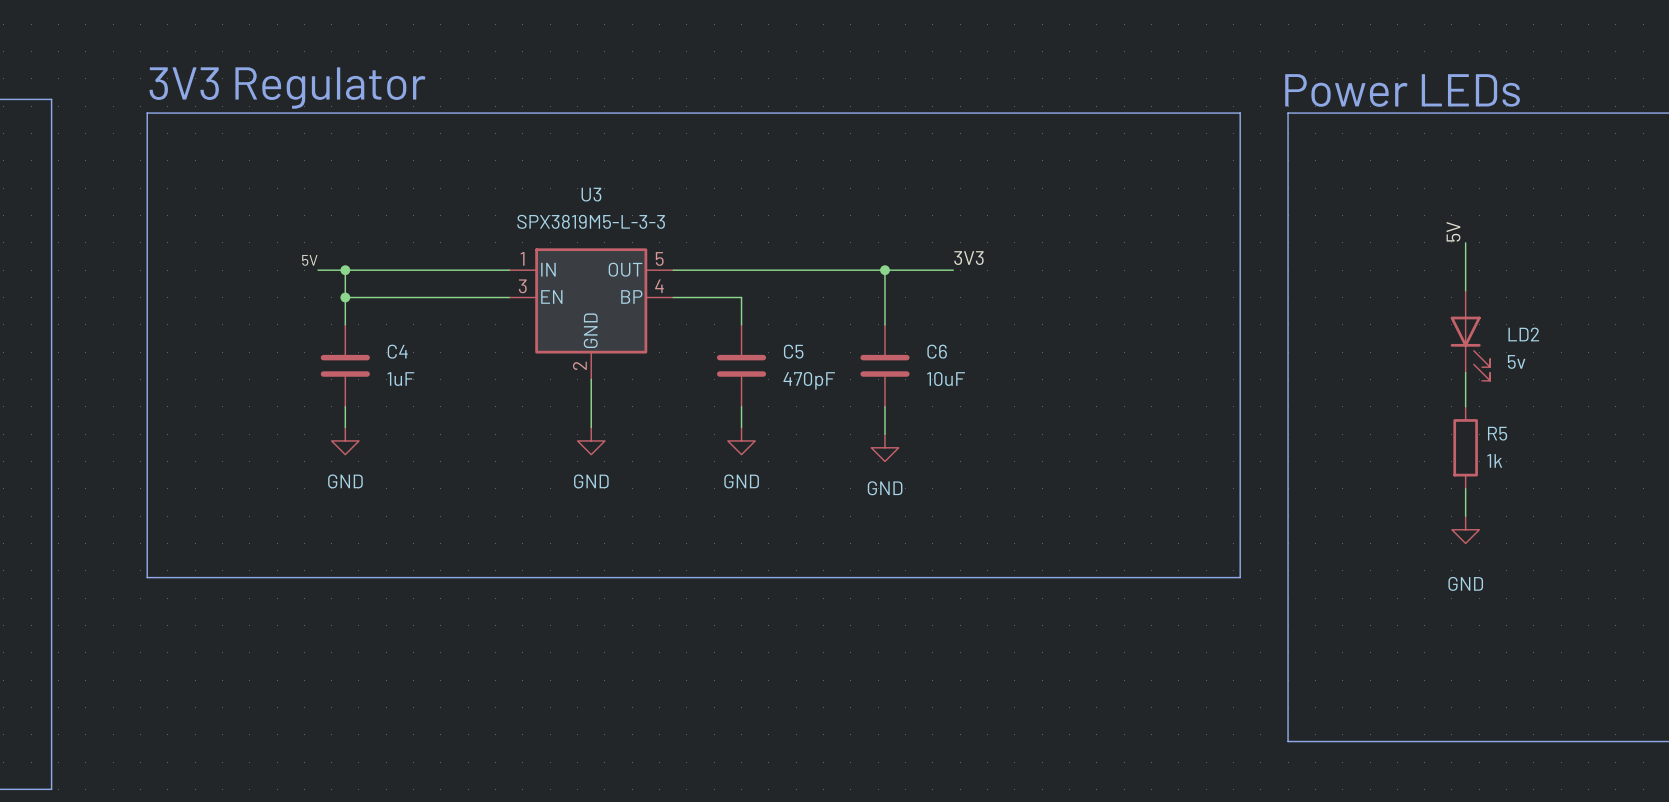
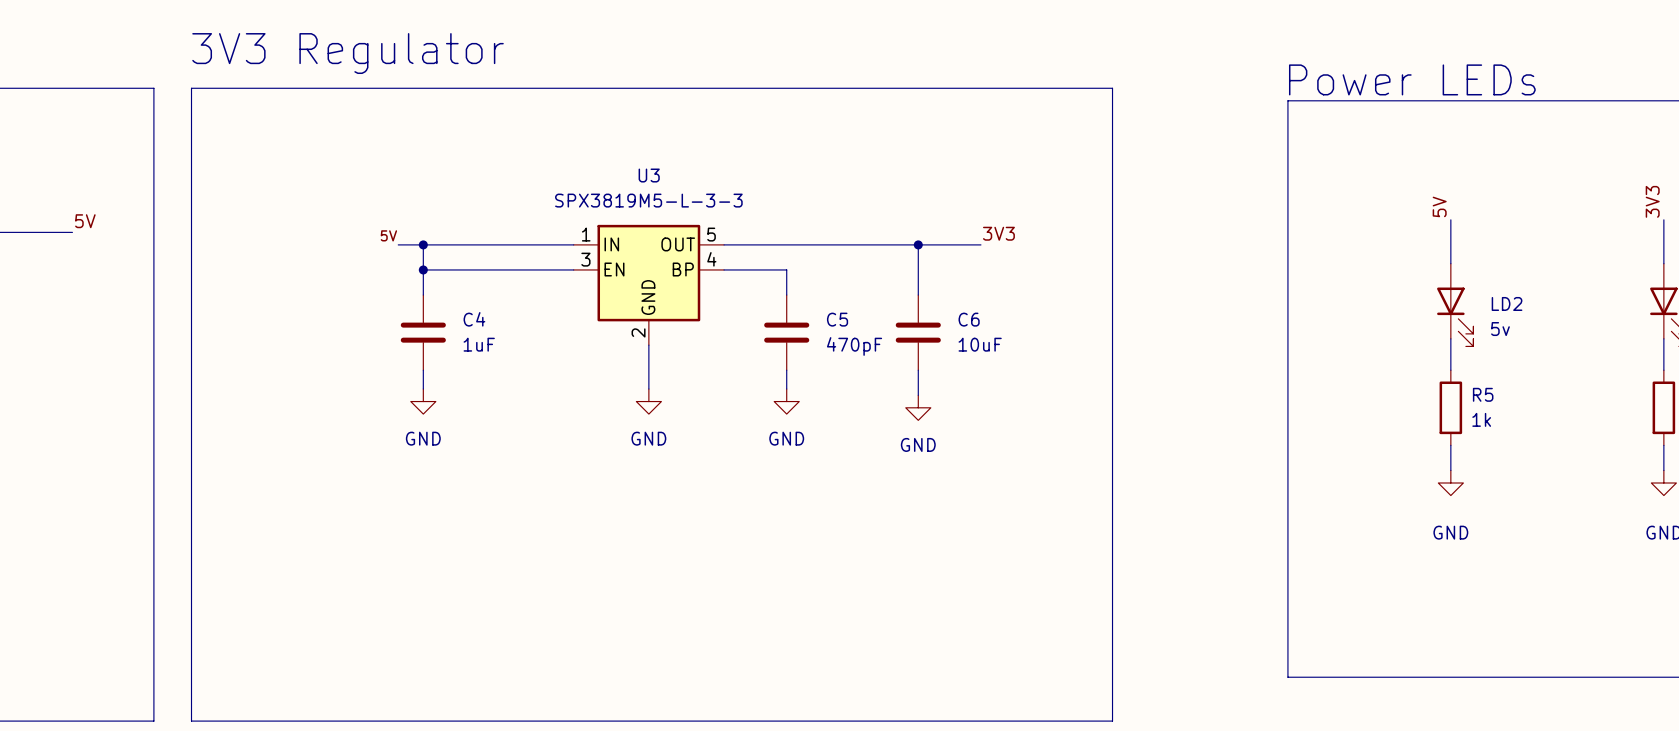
text position: 3V3 Regulator (287, 88) -> 3V3 Regulator (348, 53)
line: (147, 113) (1240, 113) (1240, 577) (147, 577) (147, 113) -> (191, 88) (191, 721) (1112, 721) (1112, 88) (191, 88)

